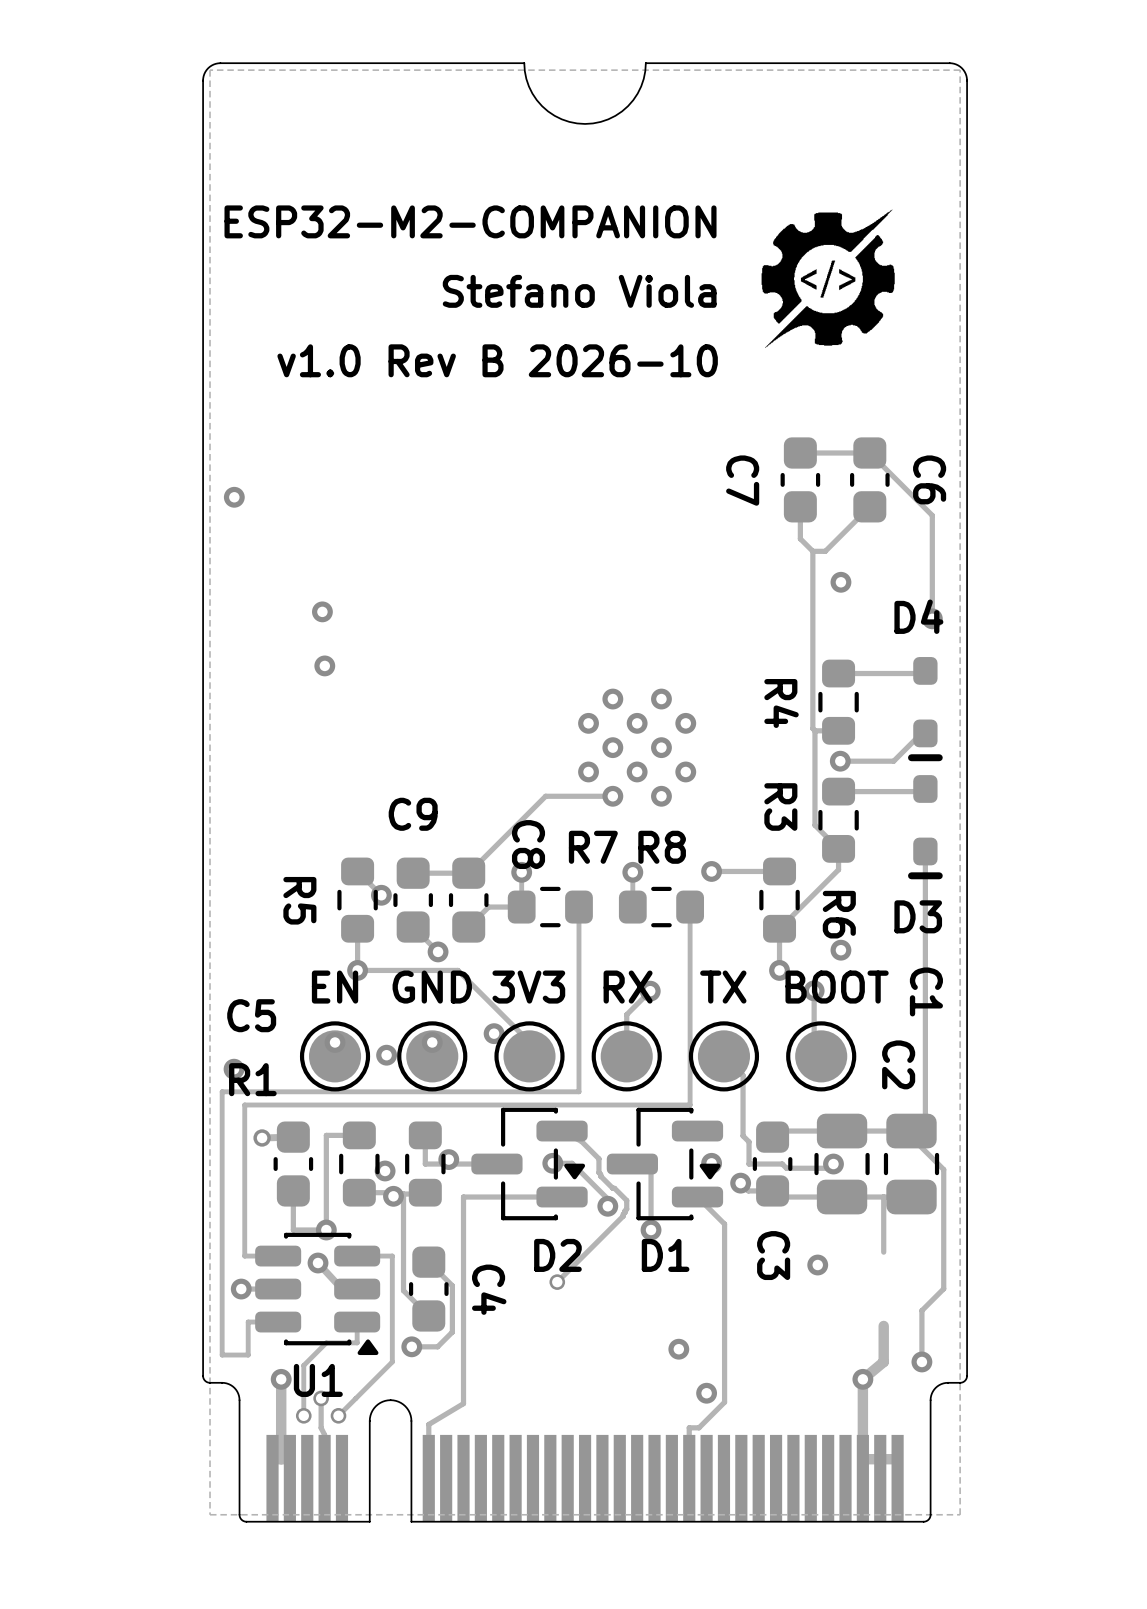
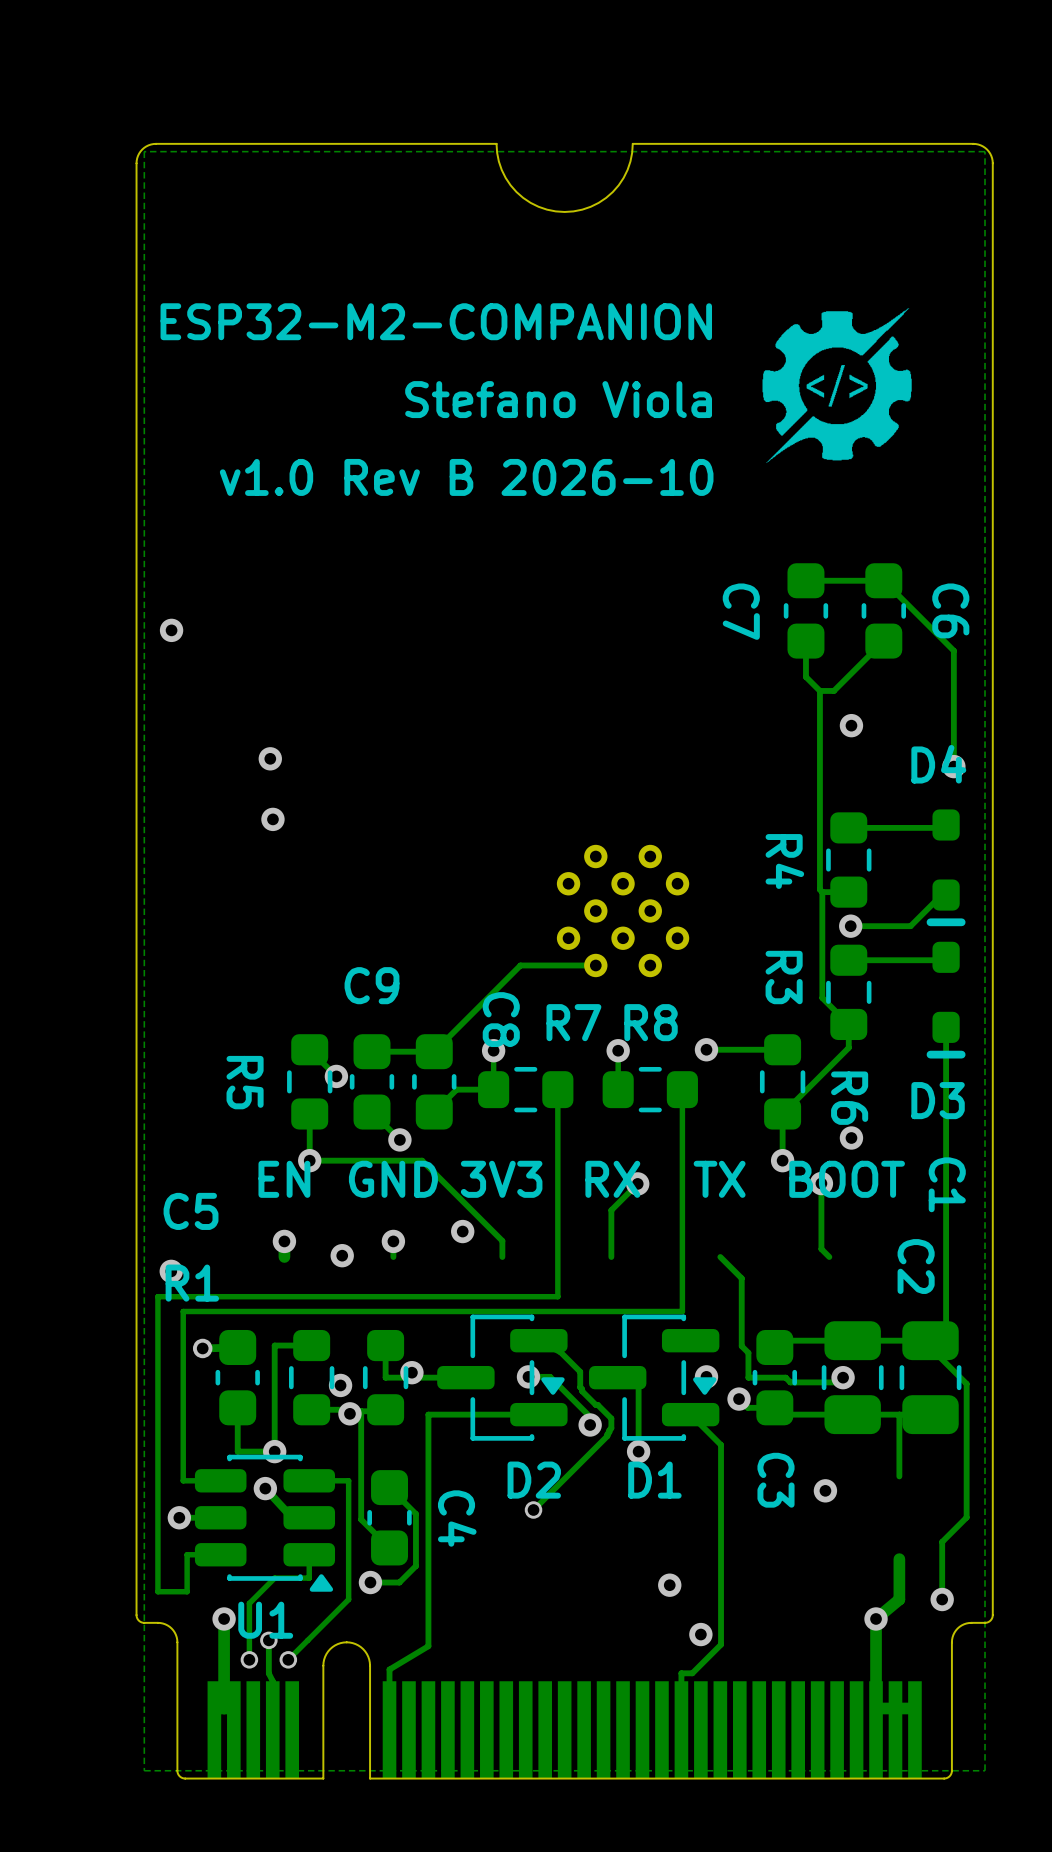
part: (335, 1056) -> none
part: (432, 1056) -> none
part: (529, 1056) -> none
part: (626, 1056) -> none
part: (723, 1056) -> none
part: (821, 1056) -> none

